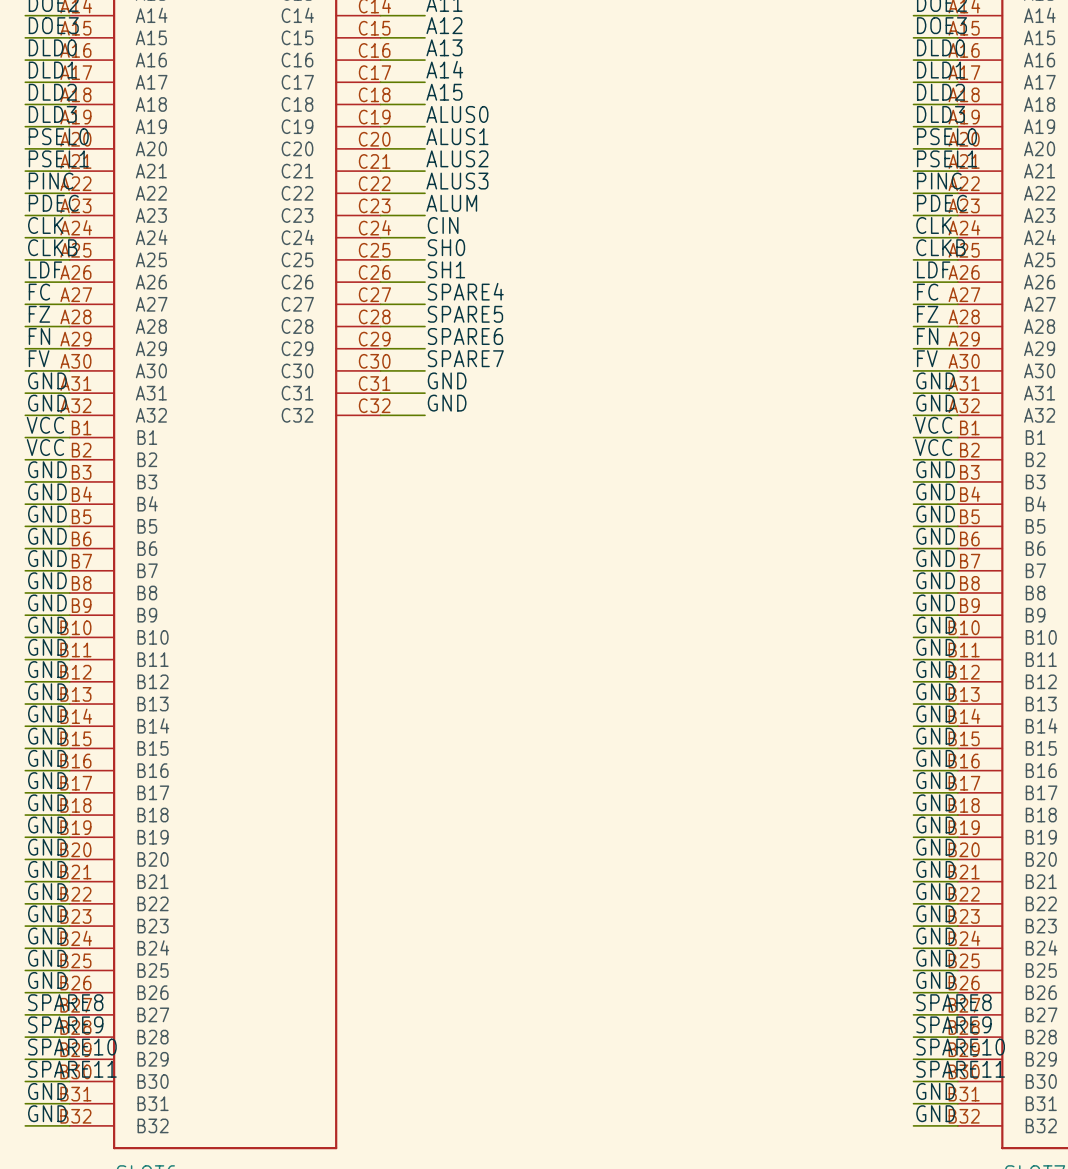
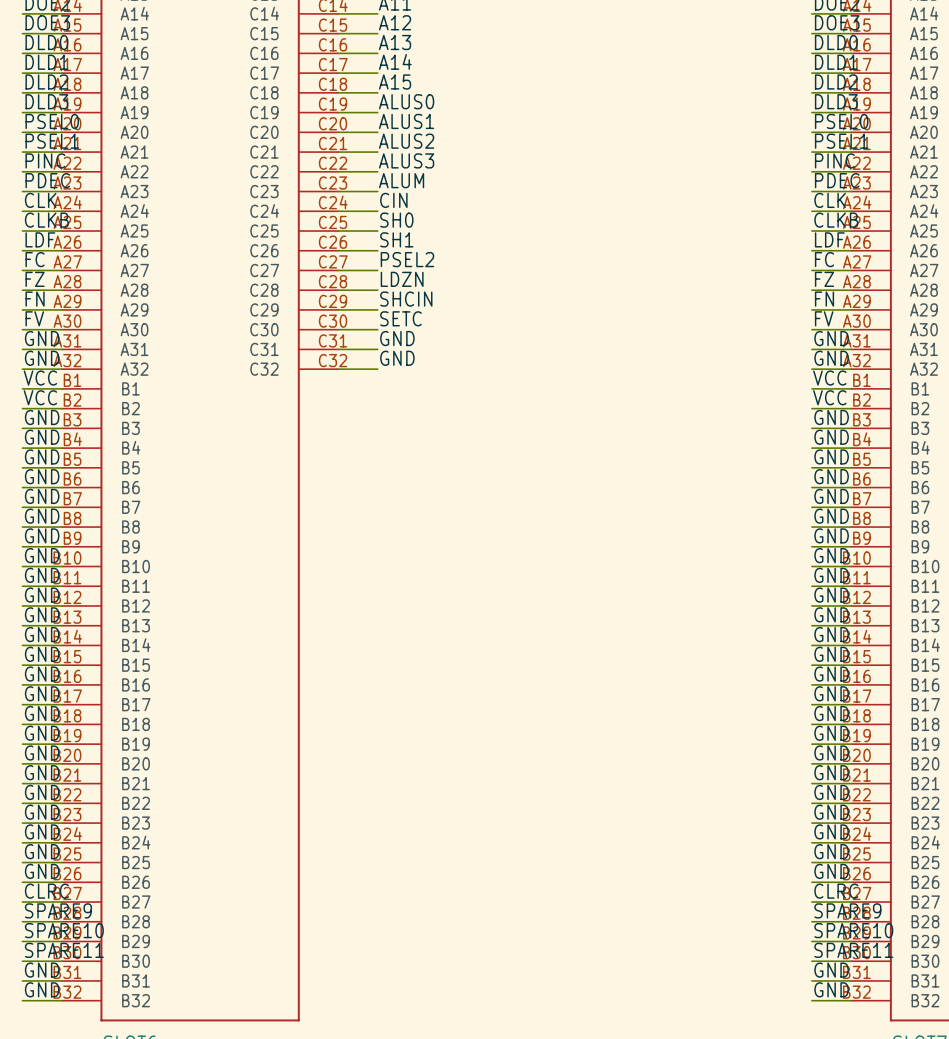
label: SPARE4 (465, 291) -> PSEL2 (407, 259)
label: SPARE5 (465, 314) -> LDZN (402, 279)
label: SPARE6 (465, 336) -> SHCIN (406, 299)
label: SPARE7 (465, 358) -> SETC (400, 318)
label: SPARE8 (65, 1002) -> CLRC (46, 891)
label: SPARE8 (953, 1002) -> CLRC (836, 891)

